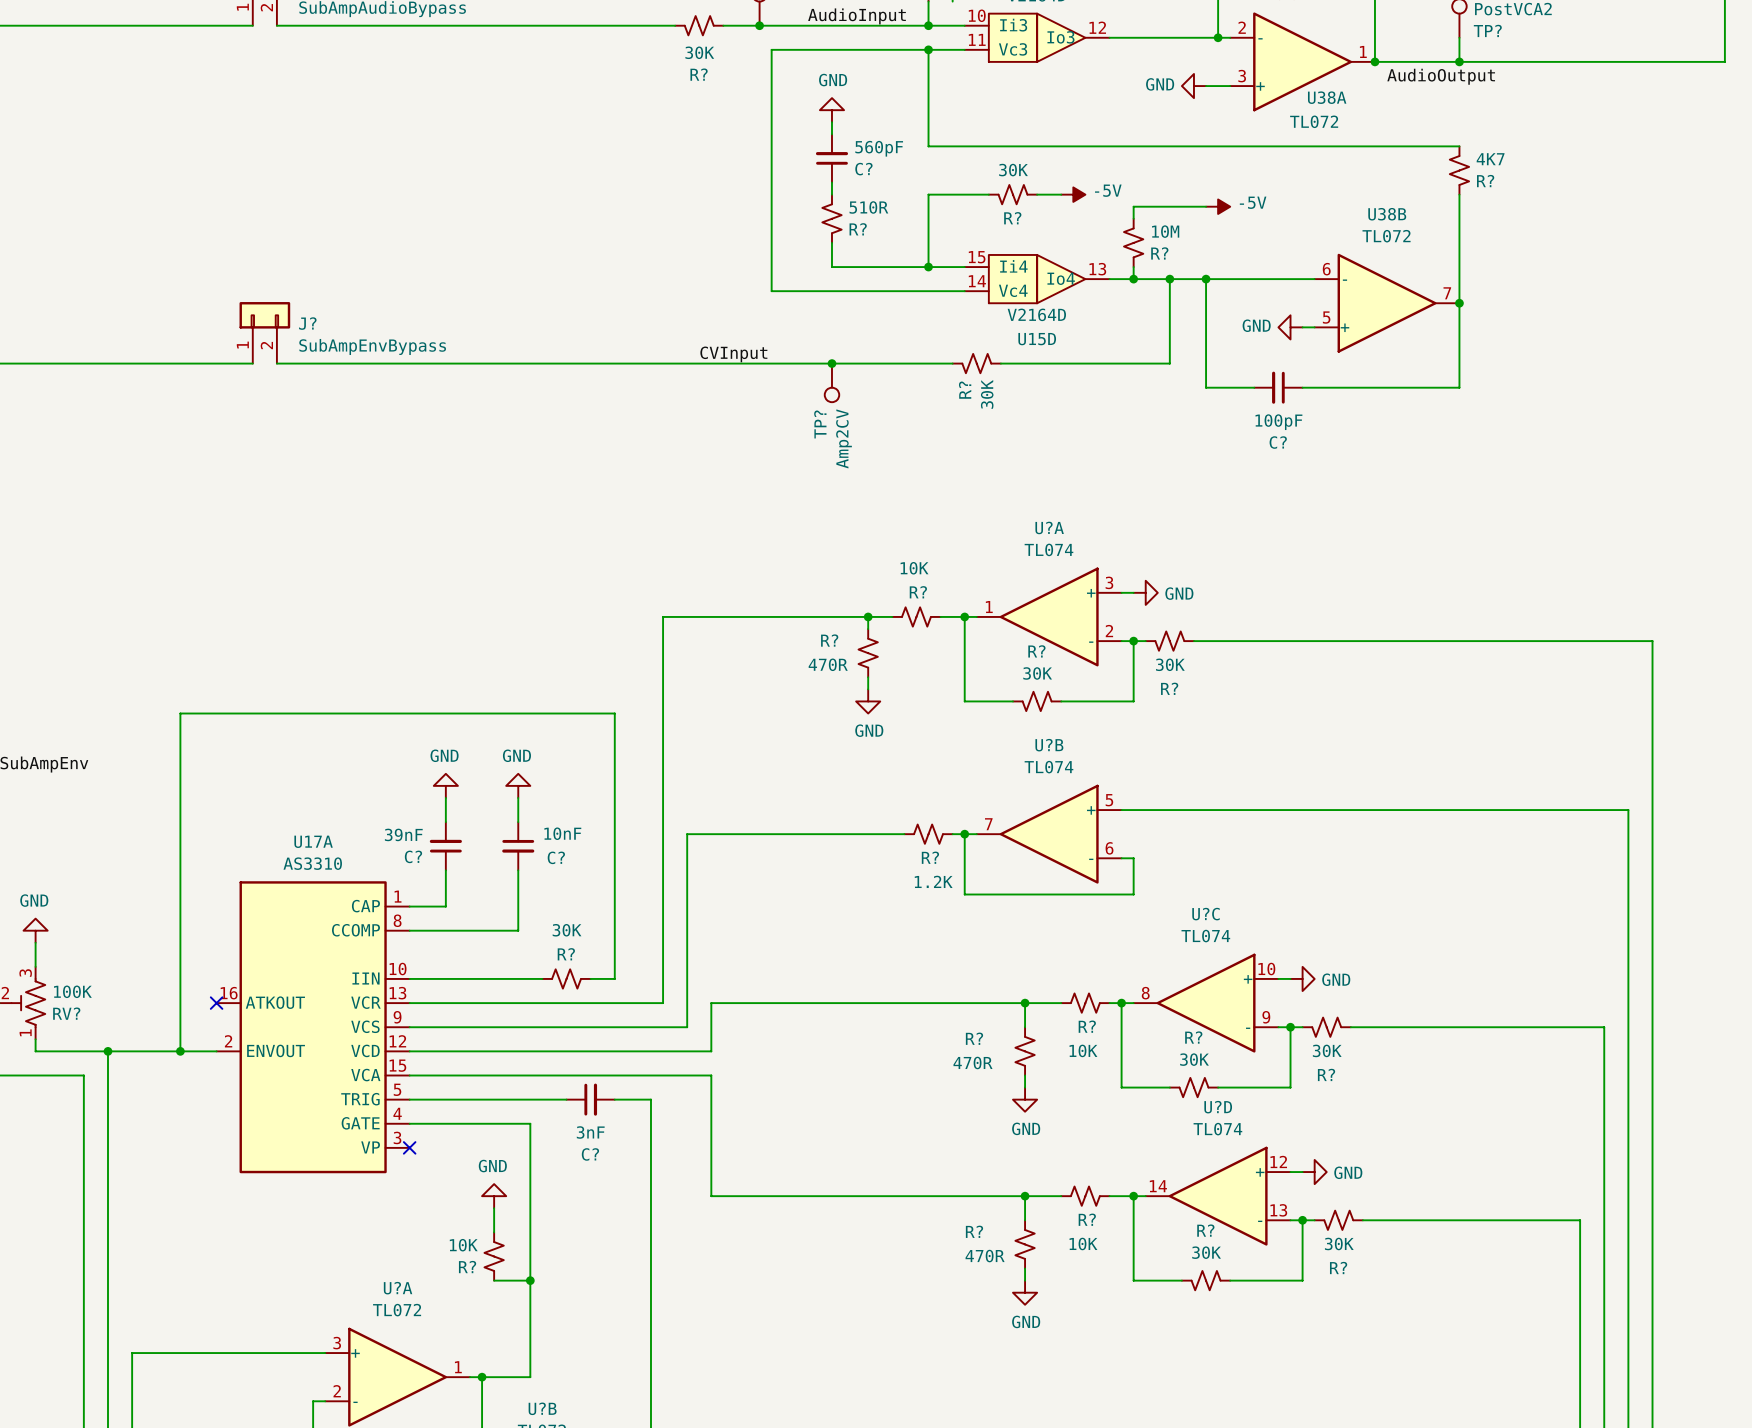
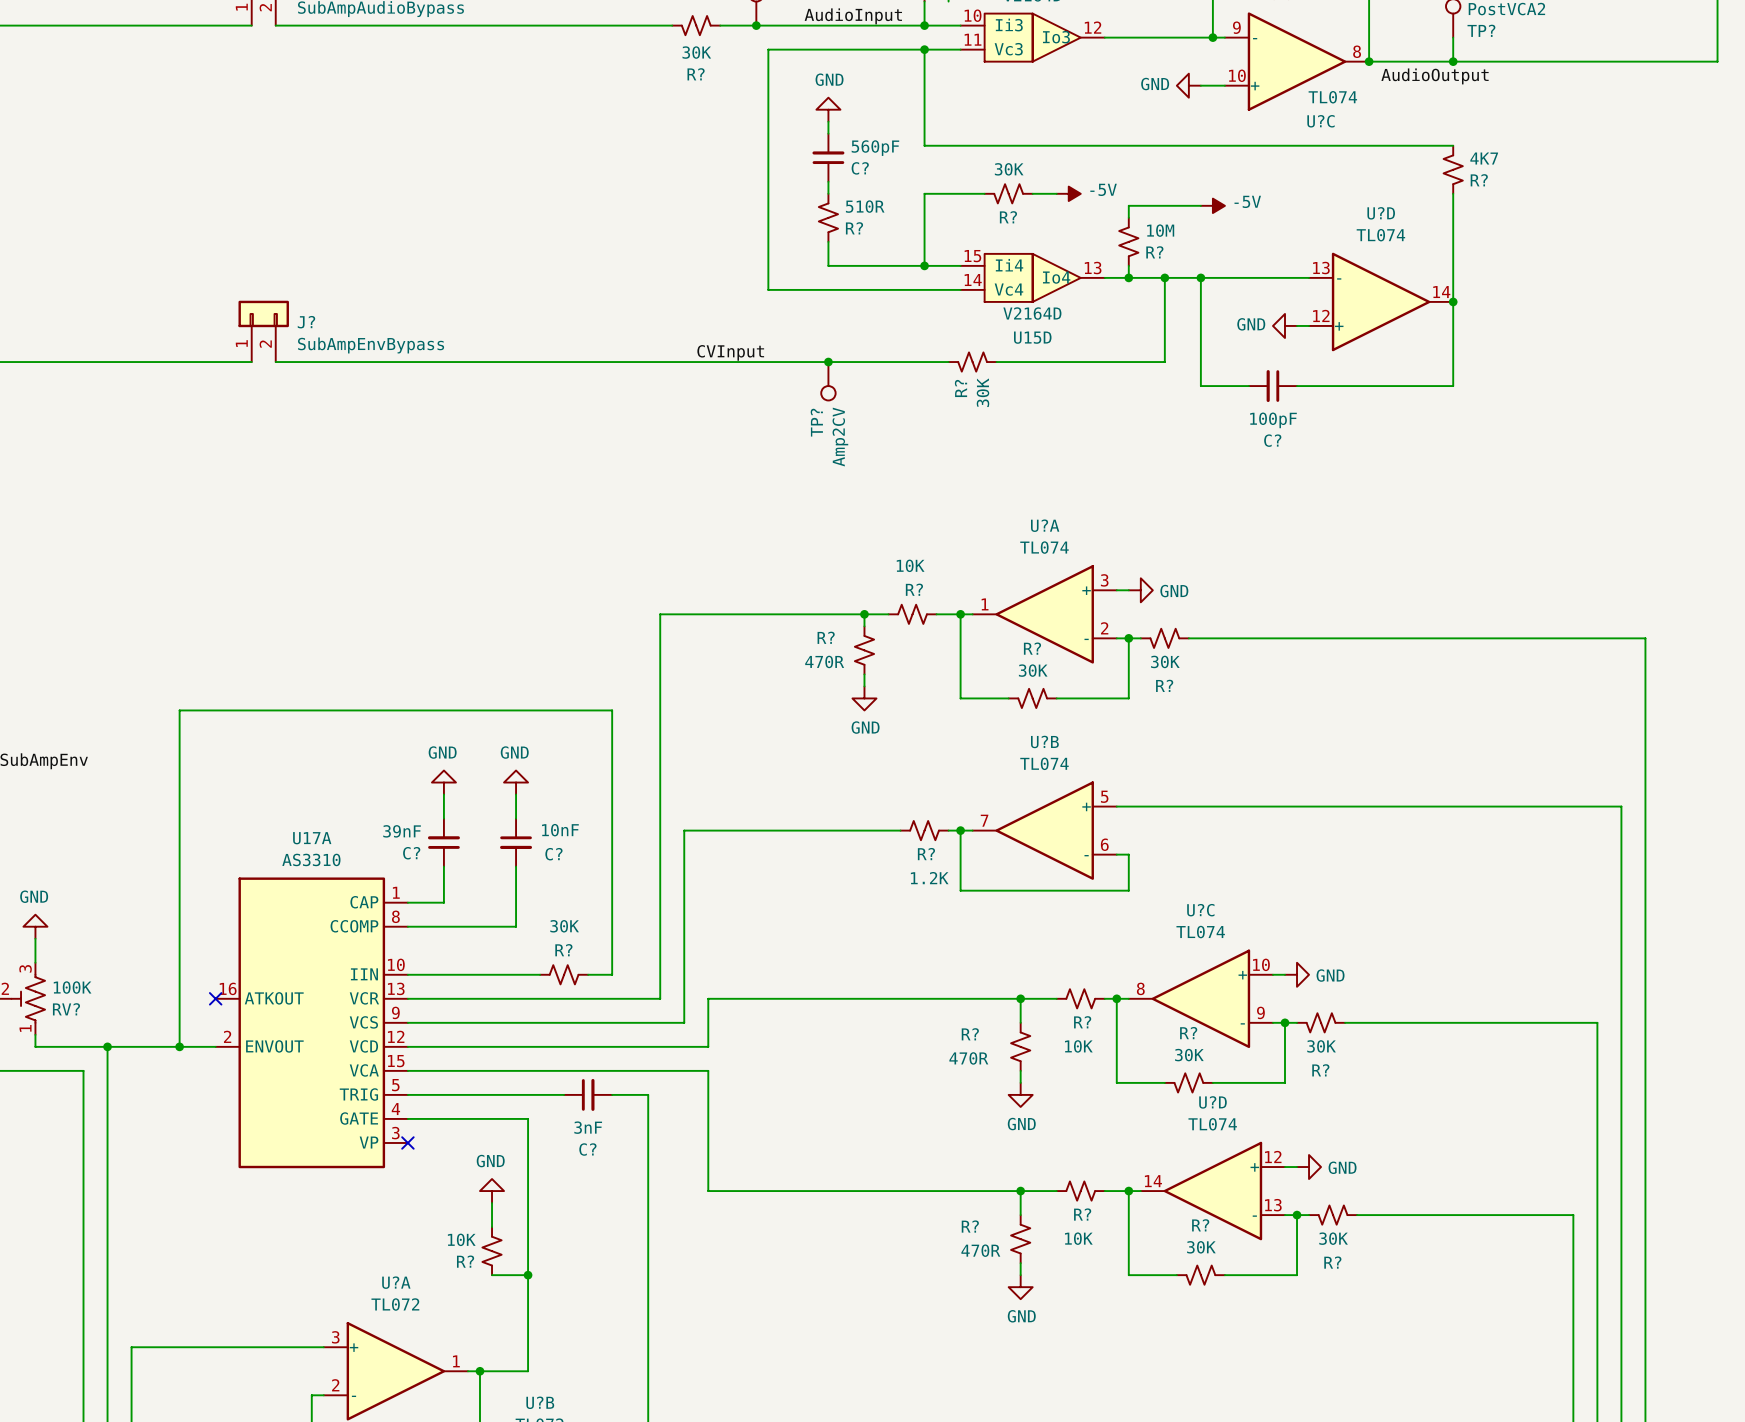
U38A pin number: 2 (1242, 27) -> 9 (1236, 27)
U38A pin number: 1 (1363, 51) -> 8 (1357, 51)
U38A pin number: 3 (1242, 76) -> 10 (1237, 75)
U38A name: U38A (1327, 97) -> U?C (1320, 121)
U38A value: TL072 (1314, 121) -> TL074 (1332, 97)
U38B name: U38B (1387, 214) -> U?D (1381, 213)
U38B value: TL072 (1386, 236) -> TL074 (1380, 235)
U38B pin number: 6 (1326, 269) -> 13 (1321, 268)
U38B pin number: 7 (1447, 293) -> 14 (1441, 292)
U38B pin number: 5 (1326, 317) -> 12 (1321, 315)

